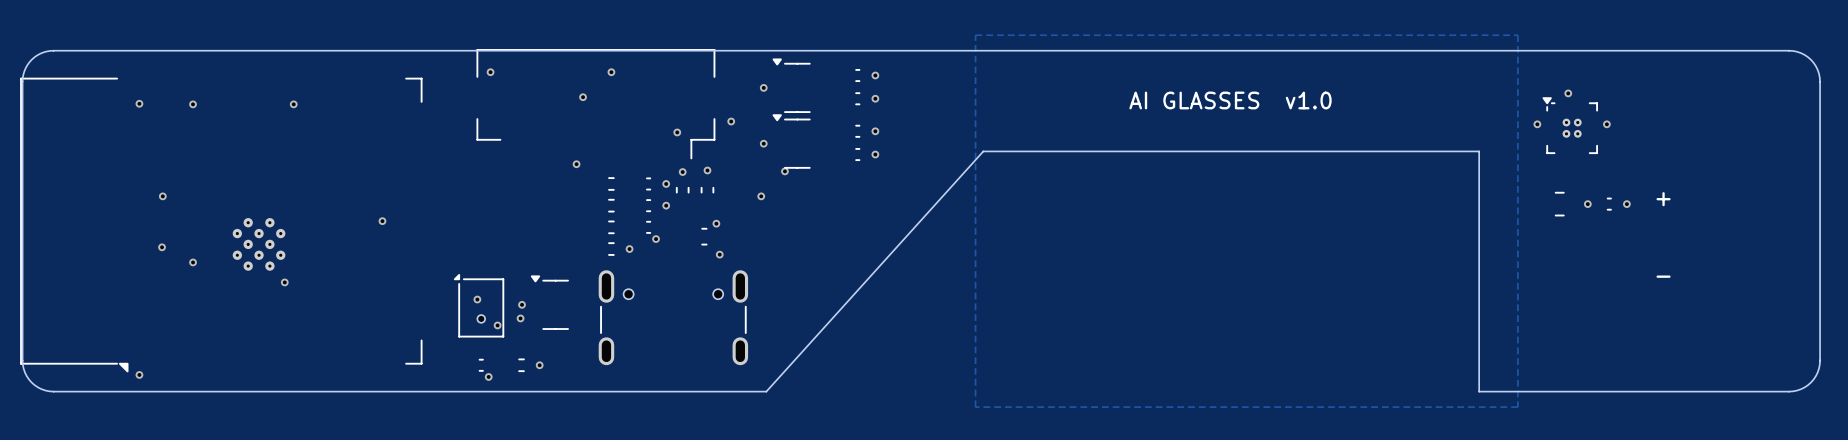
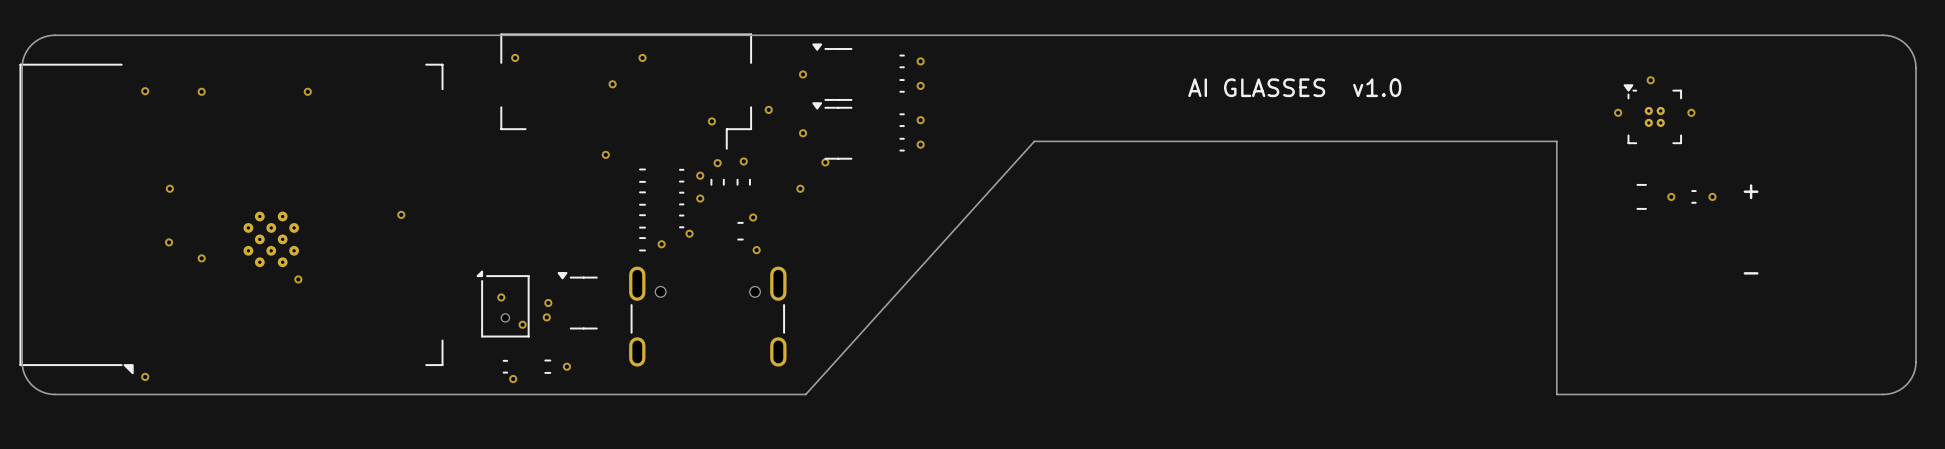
zone outline: (975, 35) (1517, 35) (1517, 407) (975, 407) (975, 35) -> none

